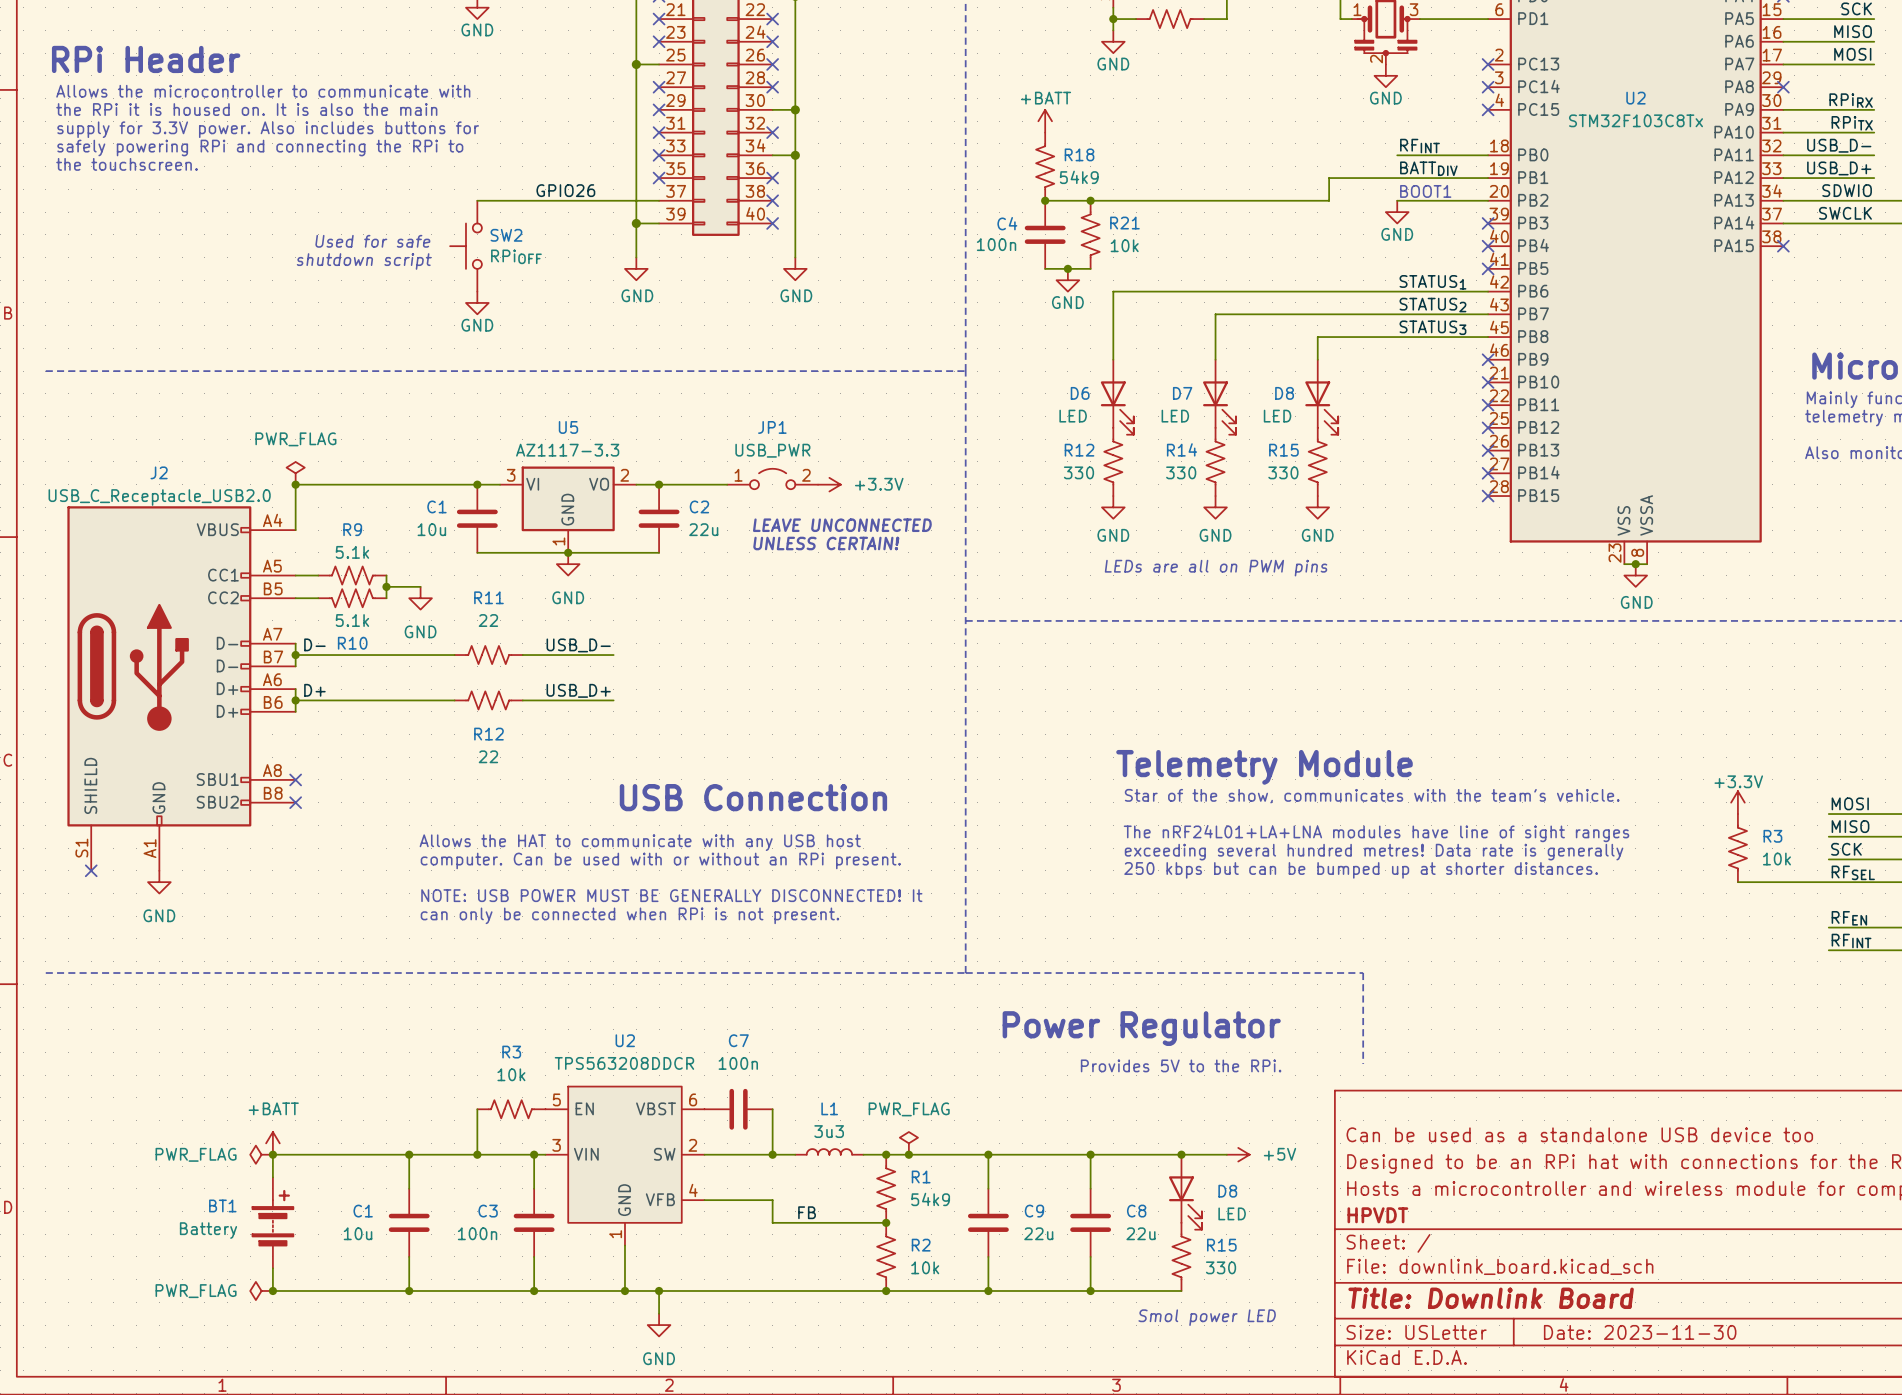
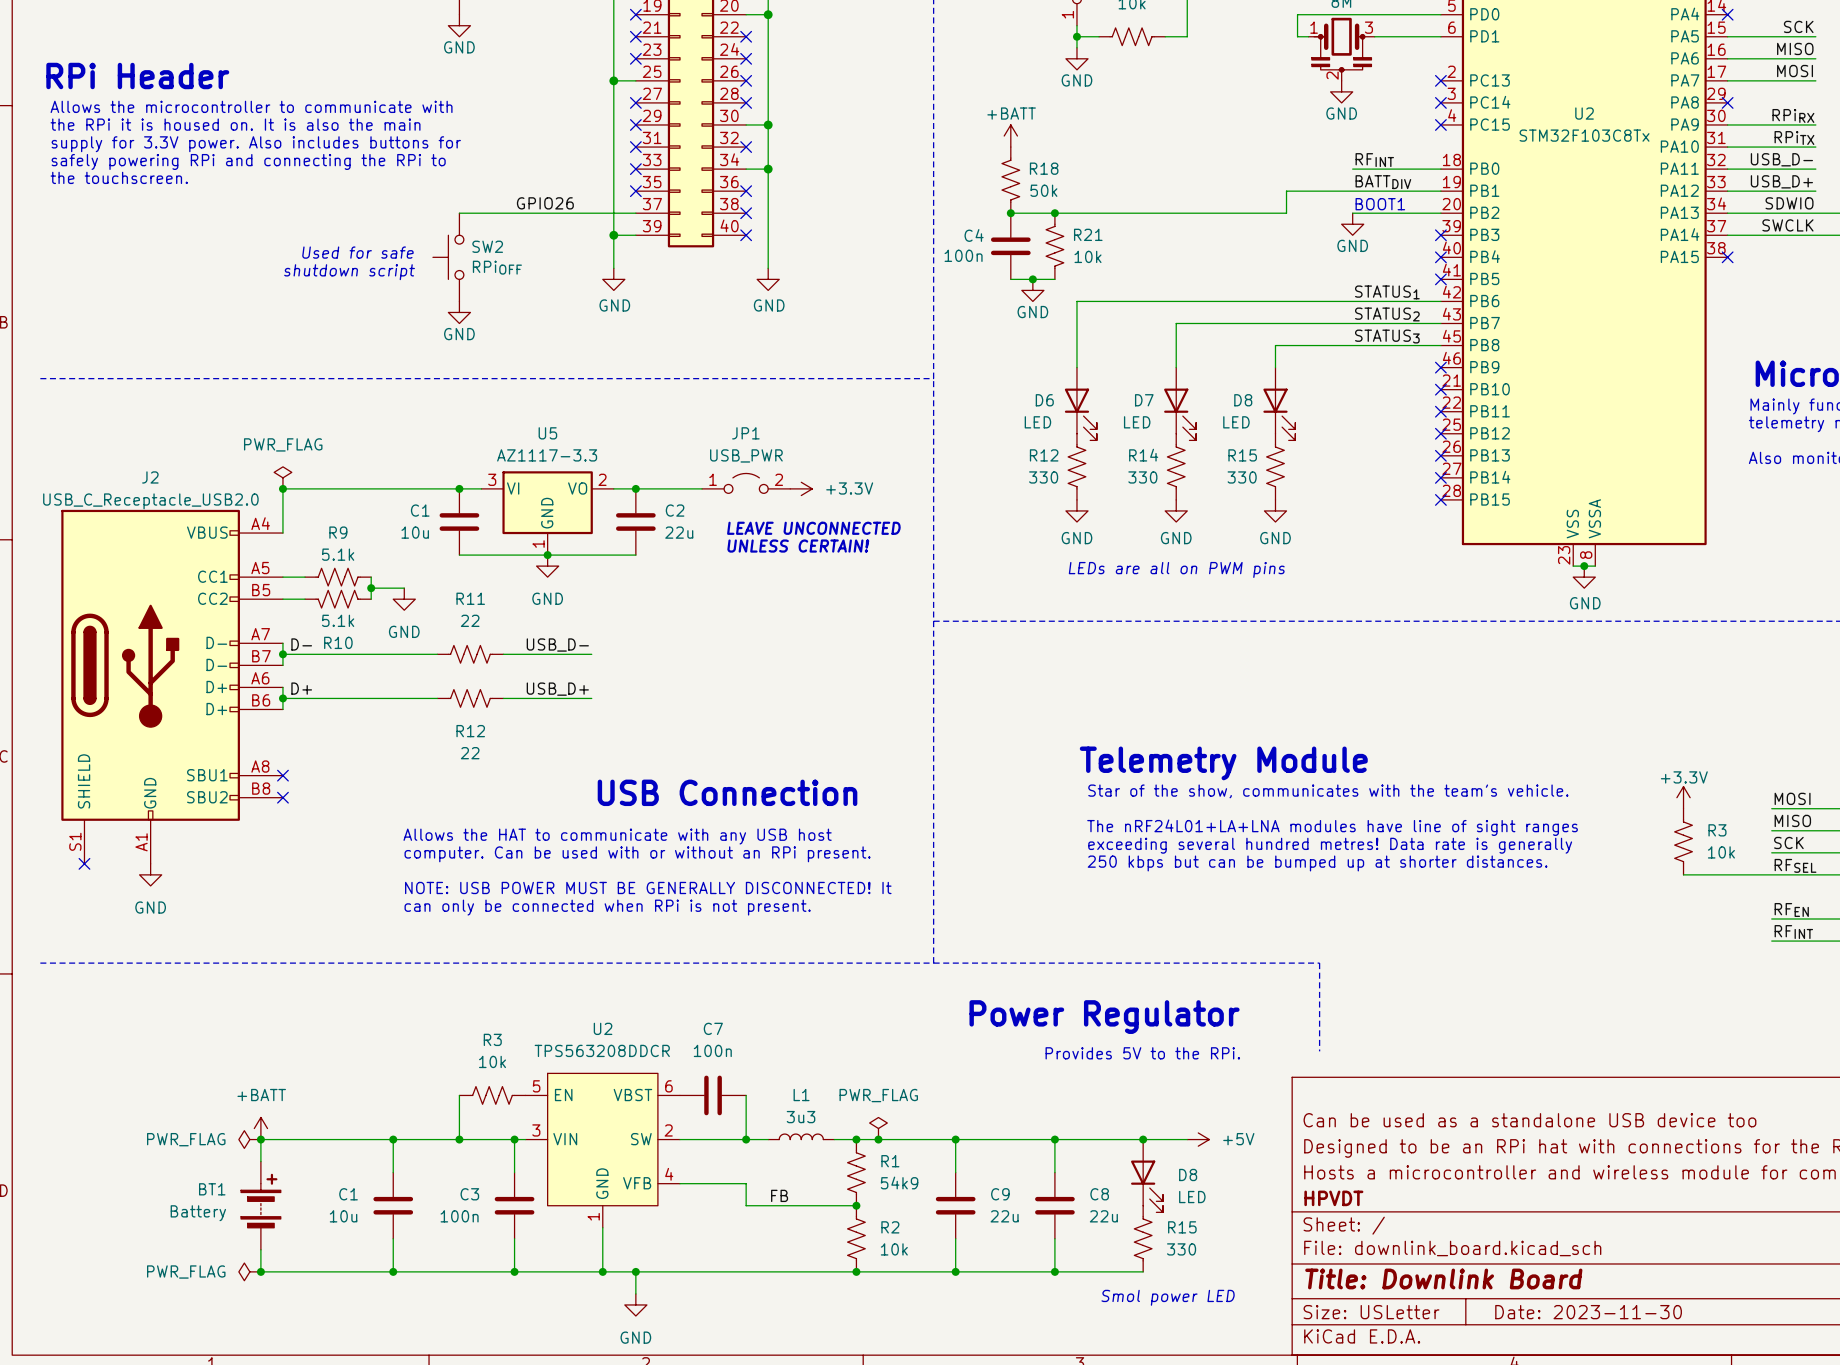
R18 value: 54k9 (1079, 177) -> 50k (1043, 190)

